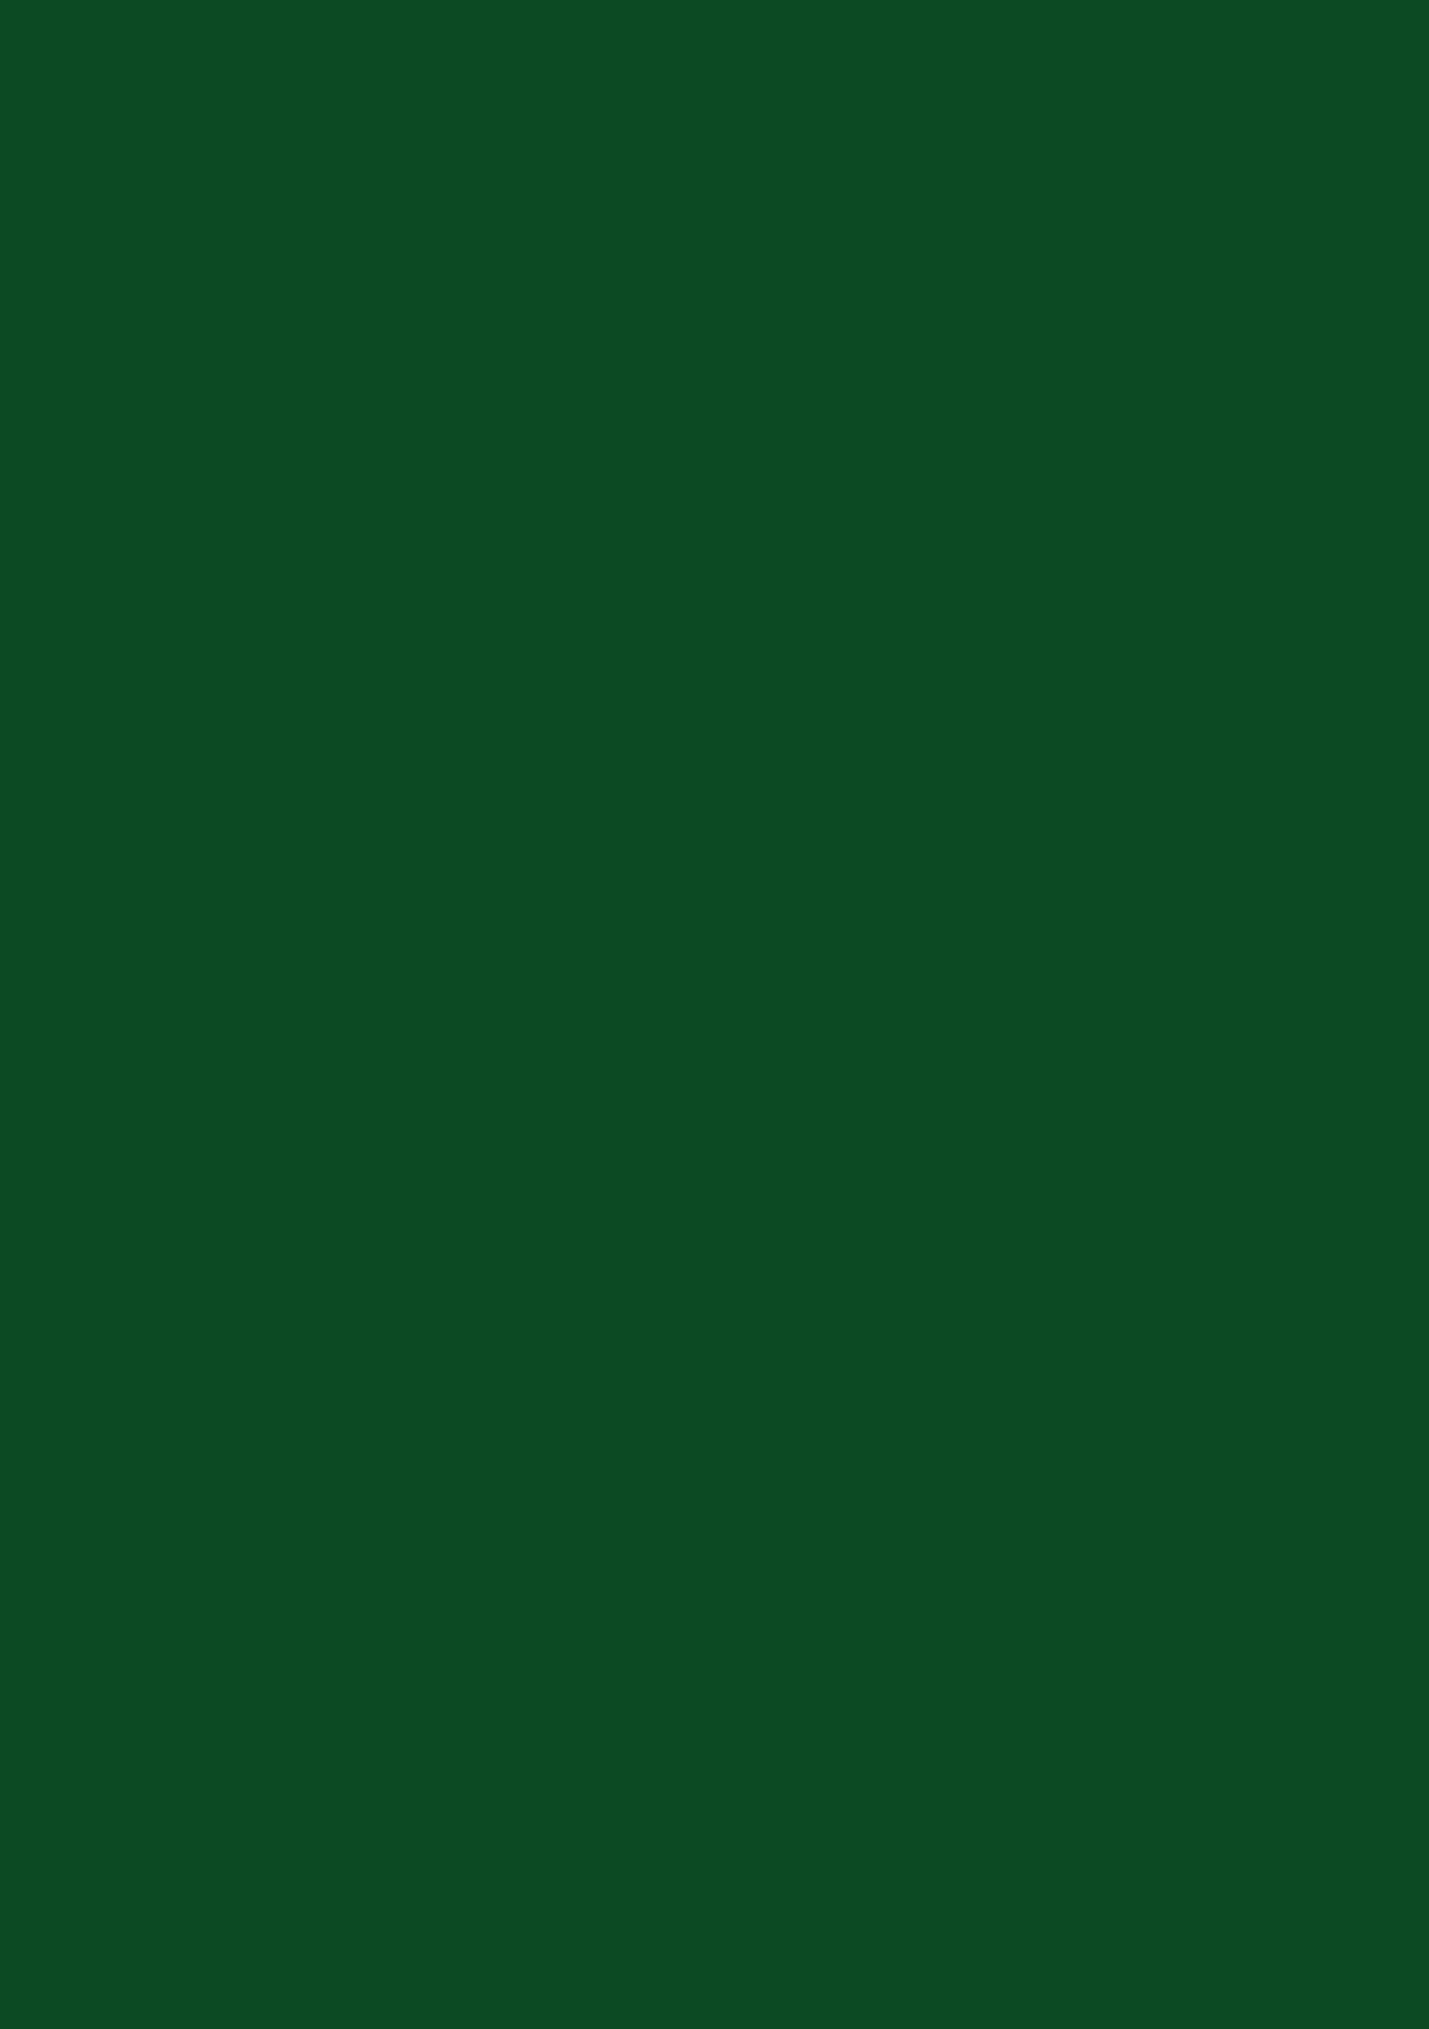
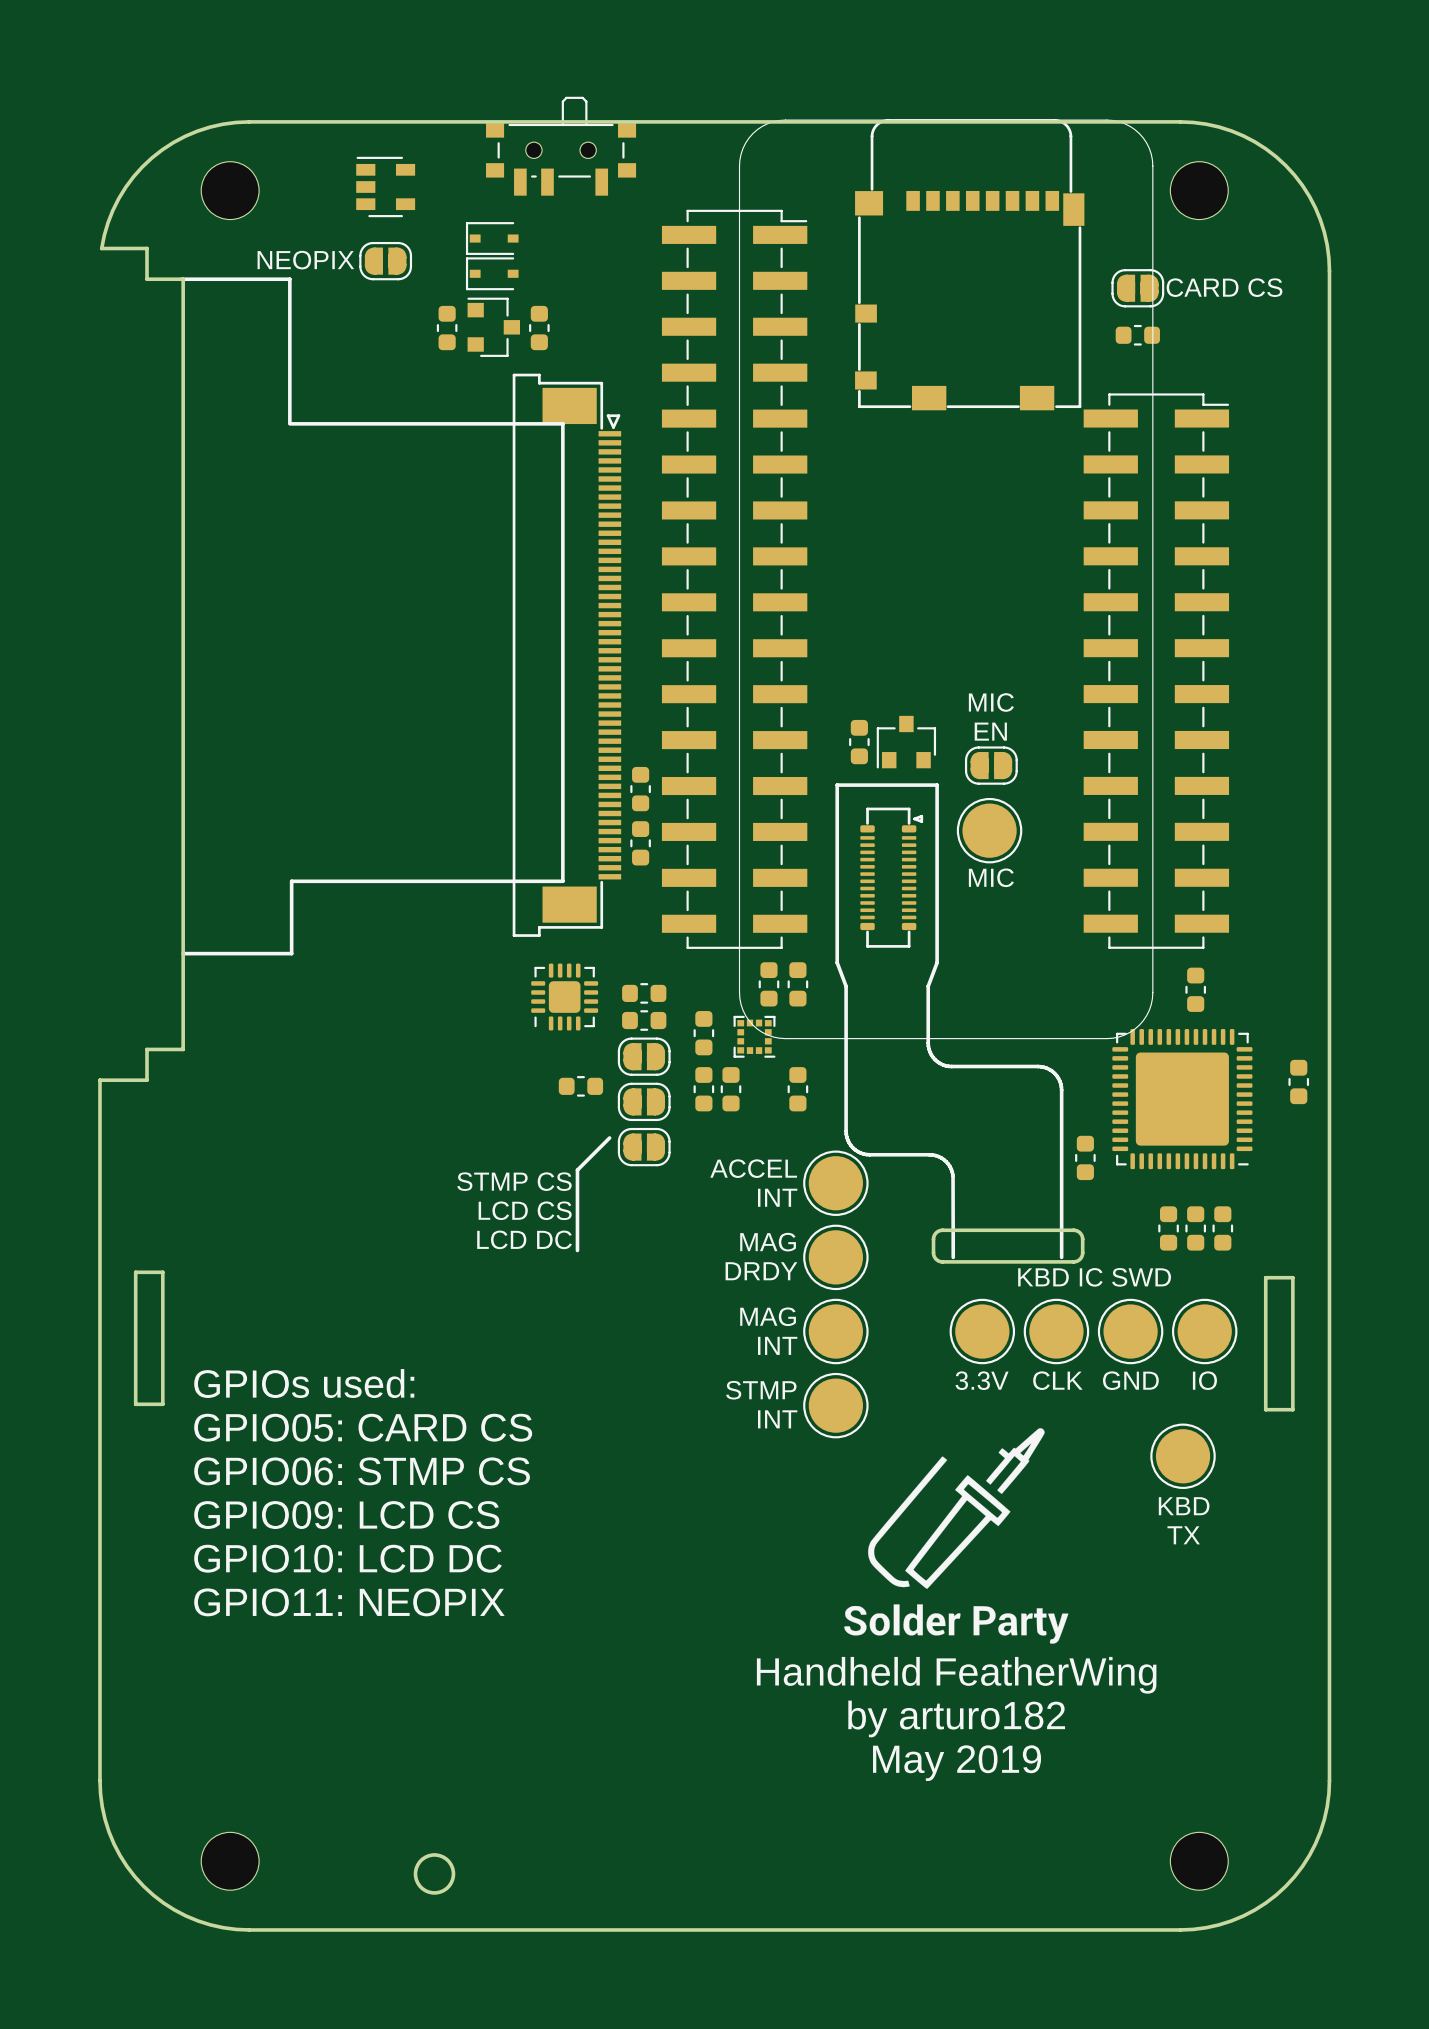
board edge: none -> (249, 121) (1193, 122) (1218, 126) (1254, 141) (1285, 165) (1309, 196) (1324, 232) (1329, 271) (1329, 1780) (1324, 1819) (1309, 1855) (1285, 1886) (1254, 1910) (1218, 1924) (1180, 1929) (236, 1929) (198, 1920) (163, 1903) (143, 1886) (119, 1855) (105, 1819) (99, 1780) (99, 1080) (147, 1080) (147, 1049) (183, 1049) (183, 279) (147, 279) (147, 248) (101, 248) (108, 222) (118, 198) (133, 176) (151, 157) (173, 142) (197, 131) (222, 124) (249, 121)
part: none -> (561, 146)
part: none -> (385, 187)
part: none -> (230, 190)
part: none -> (1199, 190)
part: none -> (492, 238)
text: none -> NEOPIX (305, 260)
part: none -> (385, 261)
part: none -> (969, 264)
part: none -> (492, 273)
line: none -> (181, 279) (289, 279) (289, 423)
text: none -> CARD CS (1224, 287)
part: none -> (1137, 288)
part: none -> (493, 327)
part: none -> (447, 328)
part: none -> (539, 328)
part: none -> (1137, 335)
line: none -> (291, 423) (562, 423) (562, 881) (291, 881) (291, 953) (183, 953)
part: none -> (945, 579)
part: none -> (566, 655)
text: none -> MIC (991, 702)
text: none -> EN (990, 731)
part: none -> (859, 742)
part: none -> (906, 742)
part: none -> (991, 765)
part: none -> (640, 789)
part: none -> (989, 830)
part: none -> (640, 843)
part: none -> (891, 877)
text: none -> MIC (991, 877)
part: none -> (768, 984)
part: none -> (797, 984)
part: none -> (1195, 989)
part: none -> (644, 993)
part: none -> (564, 997)
part: none -> (644, 1020)
part: none -> (703, 1033)
part: none -> (754, 1036)
line: none -> (928, 1042) (933, 1057) (945, 1065) (1038, 1066)
line: none -> (928, 1042) (928, 986) (937, 962) (937, 785) (837, 785) (837, 962) (846, 986) (846, 1131)
part: none -> (644, 1056)
line: none -> (1038, 1066) (1052, 1071) (1058, 1078) (1061, 1087) (1061, 1257)
part: none -> (1298, 1082)
part: none -> (580, 1086)
part: none -> (703, 1089)
part: none -> (731, 1089)
part: none -> (797, 1089)
part: none -> (1182, 1099)
part: none -> (644, 1101)
line: none -> (846, 1131) (847, 1140) (852, 1147) (860, 1152) (869, 1154)
line: none -> (609, 1137) (577, 1170) (577, 1250)
part: none -> (644, 1147)
line: none -> (869, 1154) (929, 1154)
line: none -> (929, 1154) (943, 1159) (949, 1166) (952, 1175)
part: none -> (1085, 1157)
text: none -> ACCEL (753, 1168)
line: none -> (953, 1175) (953, 1257)
text: none -> STMP CS (514, 1181)
part: none -> (835, 1183)
text: none -> INT (777, 1197)
text: none -> LCD CS (525, 1210)
part: none -> (1168, 1228)
part: none -> (1195, 1228)
part: none -> (1222, 1228)
board edge: none -> (942, 1230) (1074, 1230) (1079, 1232) (1082, 1236) (1082, 1254) (1079, 1260) (1073, 1261) (941, 1261) (934, 1256) (933, 1239) (936, 1232) (942, 1230)
text: none -> LCD DC (524, 1239)
text: none -> MAG (768, 1242)
part: none -> (835, 1257)
text: none -> DRDY (761, 1271)
board edge: none -> (135, 1272) (162, 1272) (162, 1404) (135, 1404) (135, 1272)
text: none -> KBD IC SWD (1094, 1277)
board edge: none -> (1265, 1277) (1265, 1409) (1292, 1409) (1292, 1277) (1265, 1277)
text: none -> MAG (768, 1316)
part: none -> (835, 1331)
part: none -> (982, 1331)
part: none -> (1056, 1331)
part: none -> (1130, 1331)
part: none -> (1204, 1331)
text: none -> INT (777, 1345)
text: none -> 3.3V (982, 1380)
text: none -> CLK (1057, 1380)
text: none -> GND (1130, 1380)
text: none -> IO (1204, 1380)
text: none -> GPIOs used: (304, 1383)
text: none -> STMP (761, 1390)
part: none -> (835, 1405)
text: none -> INT (777, 1419)
text: none -> GPIO05: CARD CS (363, 1427)
drawing: none -> [844, 1428, 1069, 1644]
part: none -> (1183, 1456)
text: none -> GPIO06: STMP CS (362, 1471)
text: none -> KBD (1184, 1506)
text: none -> GPIO09: LCD CS (346, 1515)
text: none -> TX (1183, 1535)
text: none -> GPIO10: LCD DC (347, 1558)
text: none -> GPIO11: NEOPIX (349, 1602)
text: none -> Handheld FeatherWing (956, 1675)
text: none -> by arturo182 (956, 1718)
text: none -> May 2019 (957, 1763)
round board edge: none -> [413, 1853, 456, 1895]
part: none -> (230, 1861)
part: none -> (1199, 1861)

